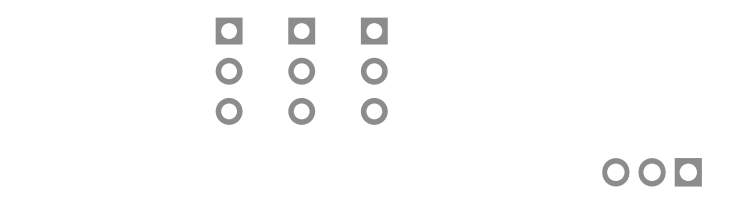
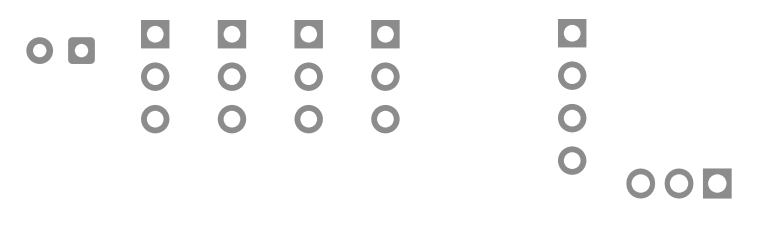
part: none -> (60, 50)
part: none -> (155, 76)
part: none -> (572, 96)

